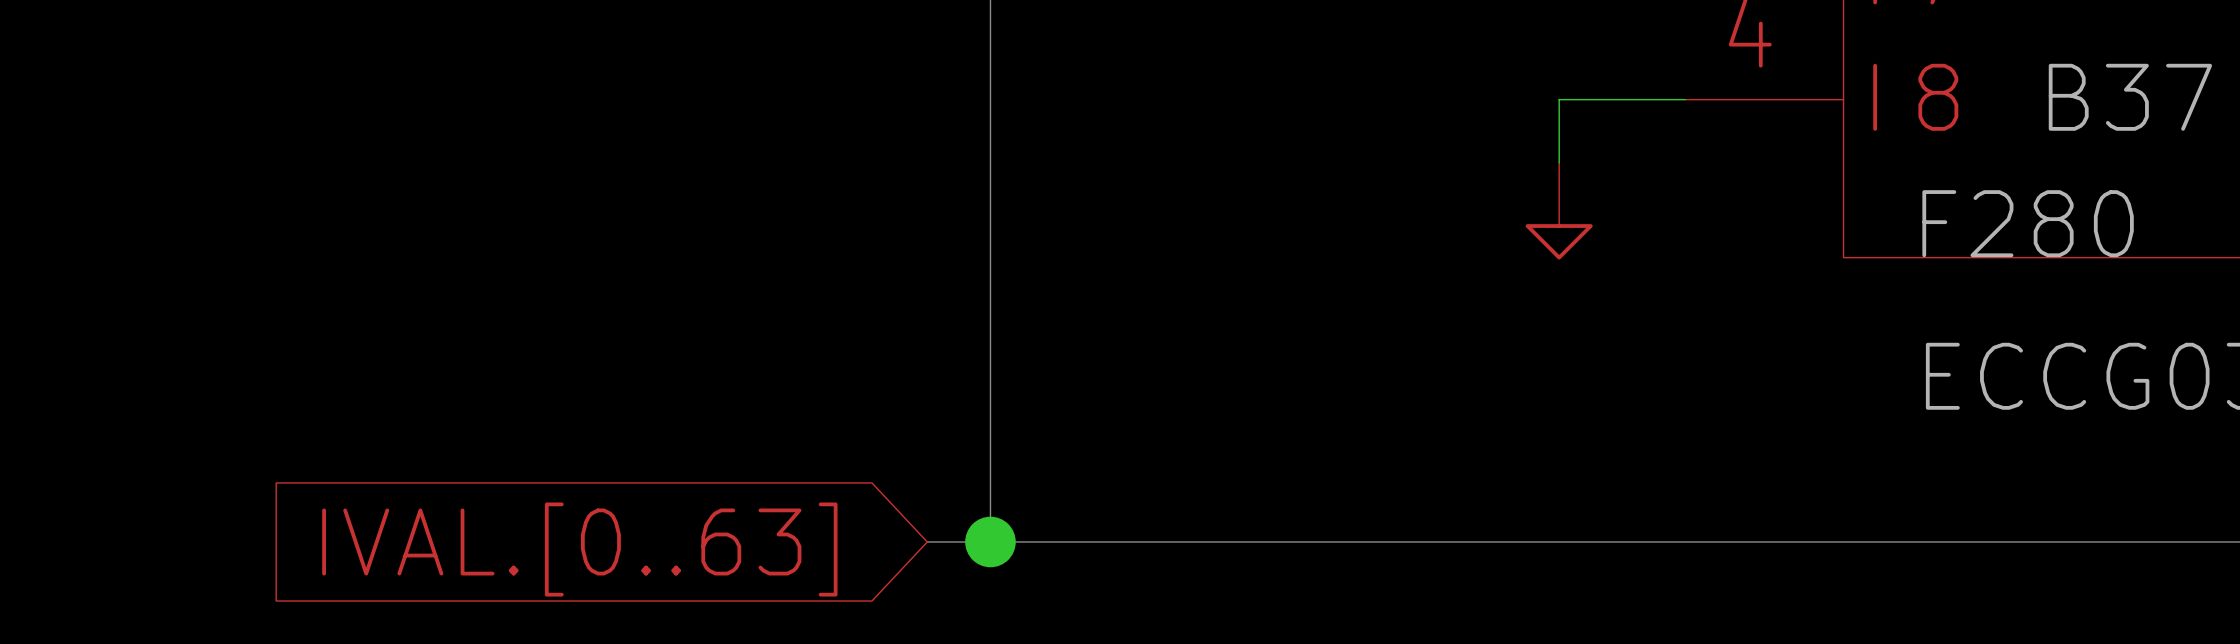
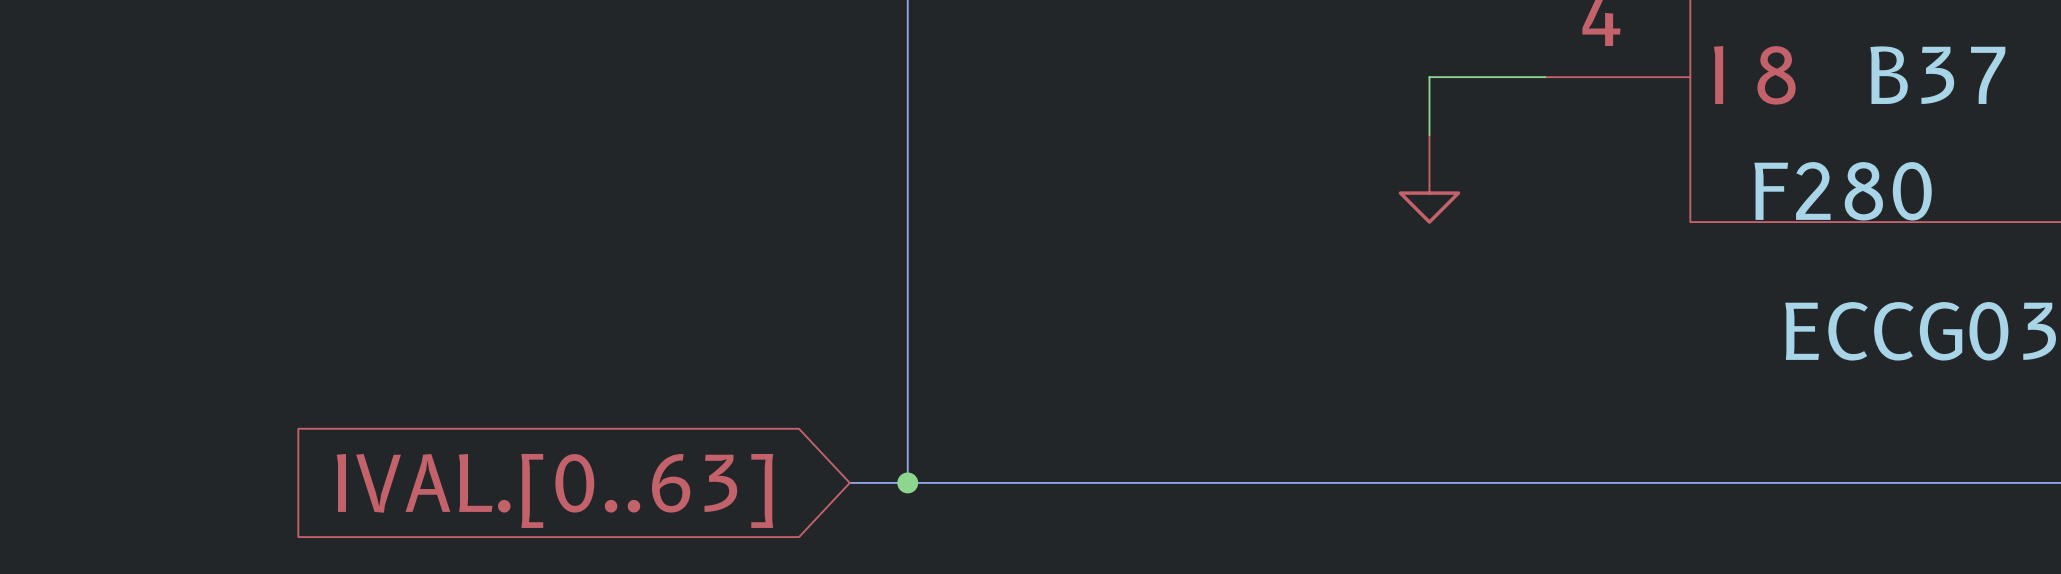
junction size: [965, 516, 1016, 568] -> [897, 472, 919, 494]

